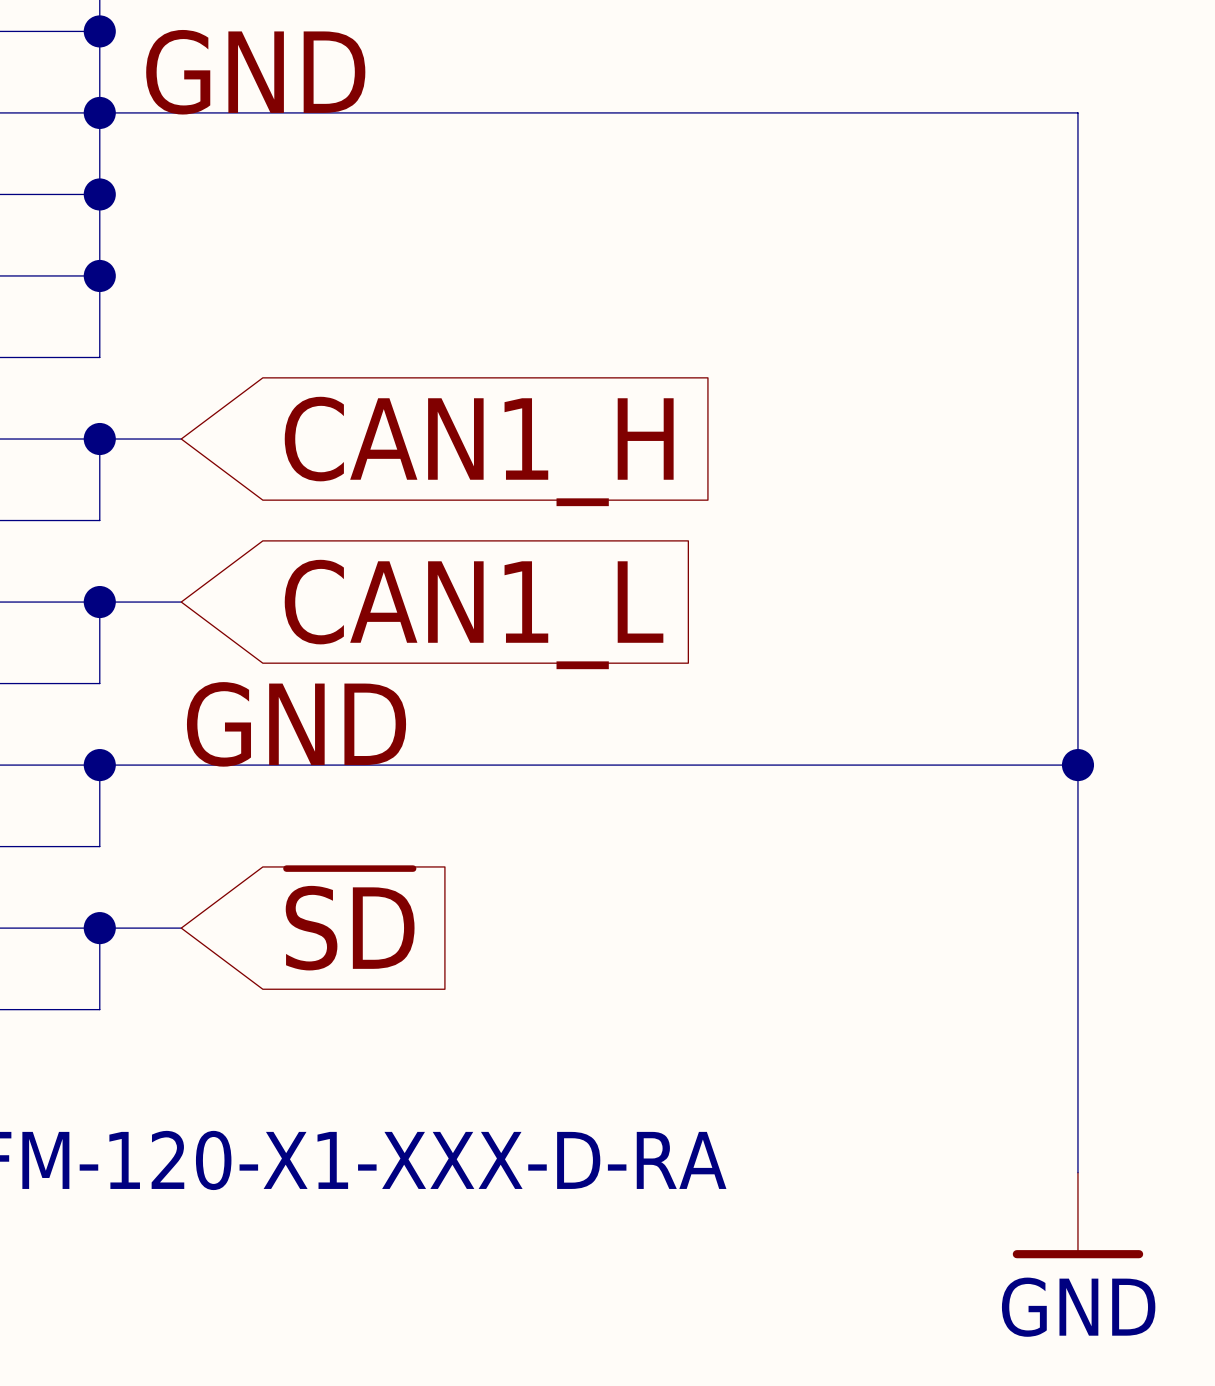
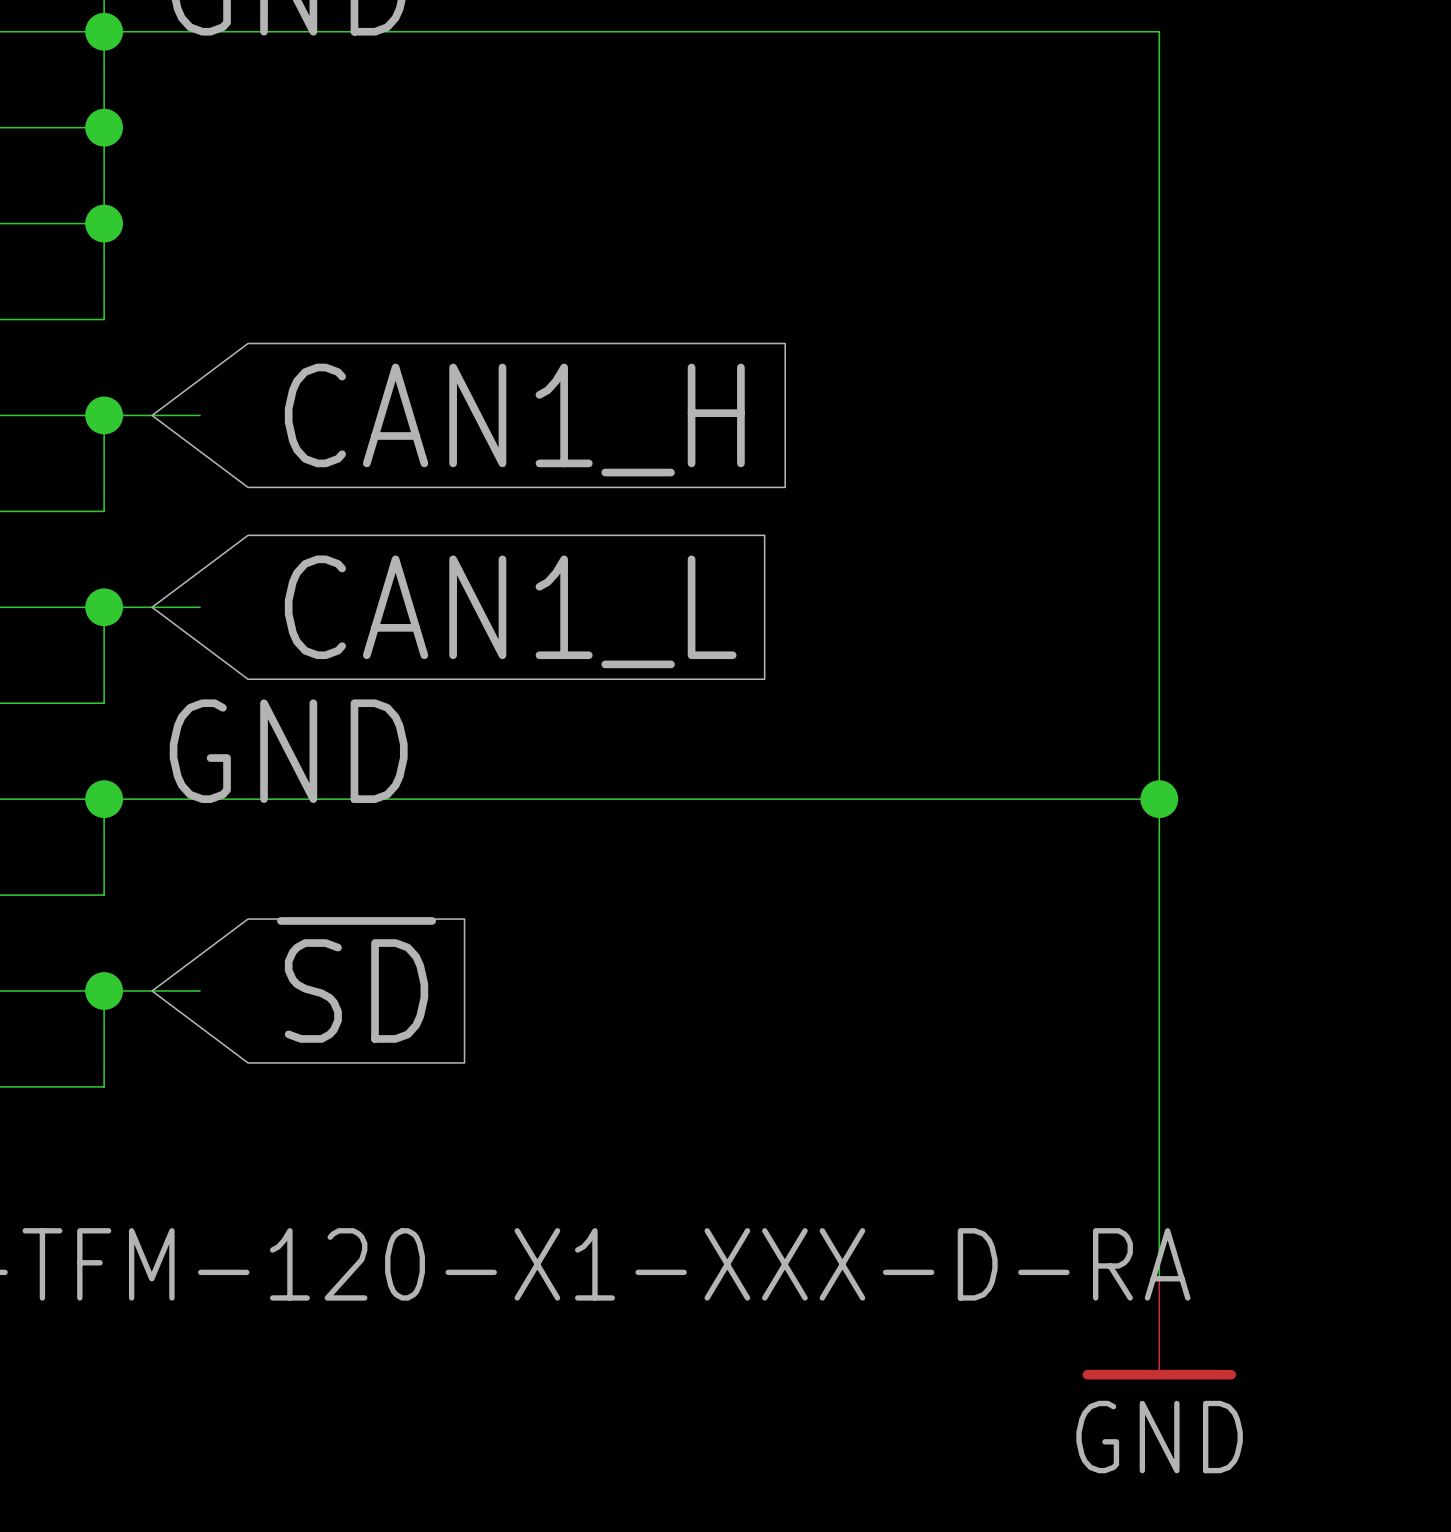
wire: (996, 112) (1077, 112) (1077, 1172) -> (1159, 31) (1159, 1278)
global label position: CAN1_H (479, 451) -> CAN1_H (514, 420)
global label position: CAN1_L (474, 614) -> CAN1_L (510, 611)
label position: GND (296, 724) -> GND (288, 751)
wire: (996, 765) (1077, 765) -> none
junction position: (1077, 765) -> (1159, 799)
global label position: ~{SD} (350, 919) -> ~{SD} (356, 979)
power symbol position: GND (1077, 1215) -> GND (1159, 1329)

